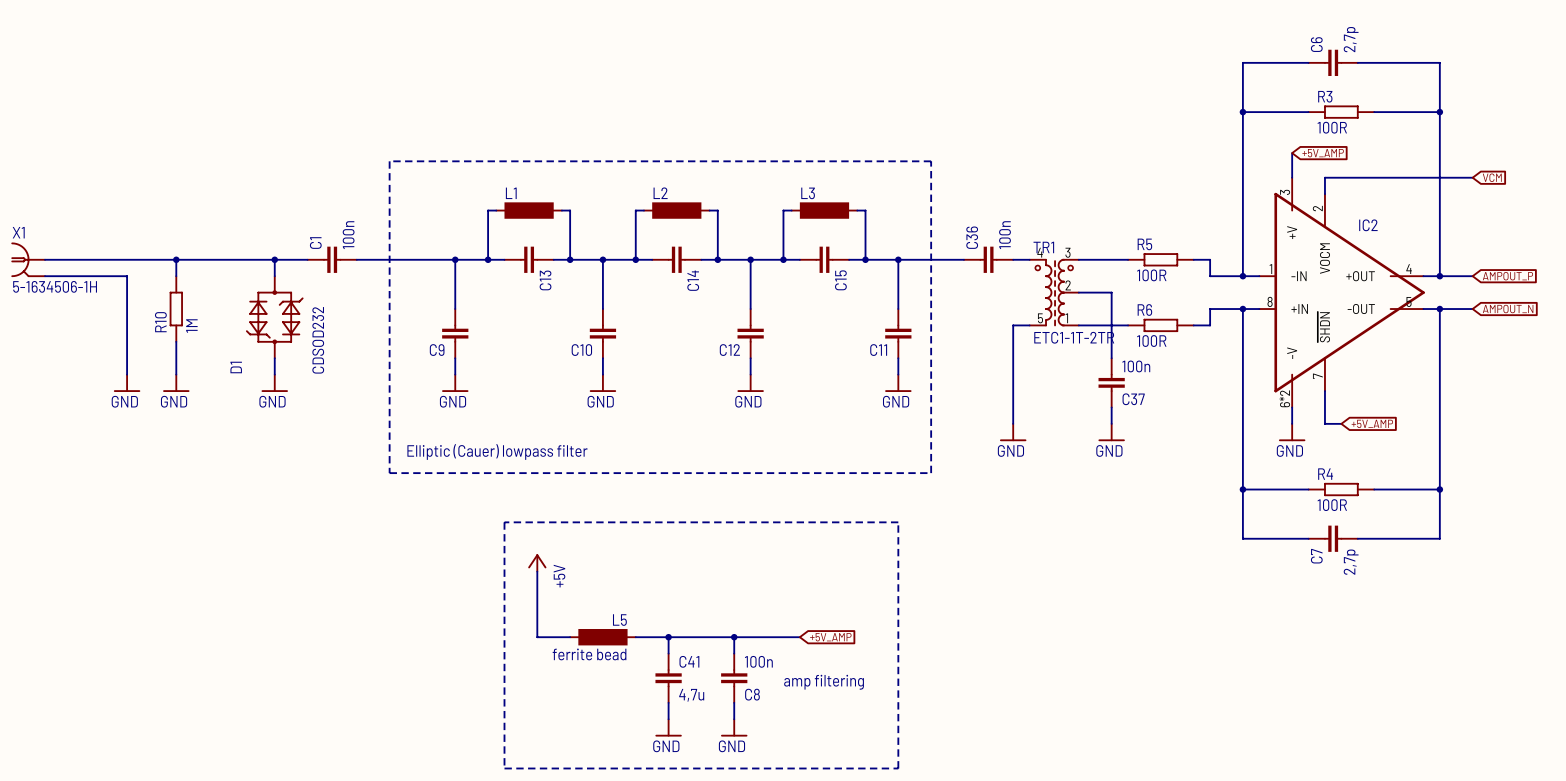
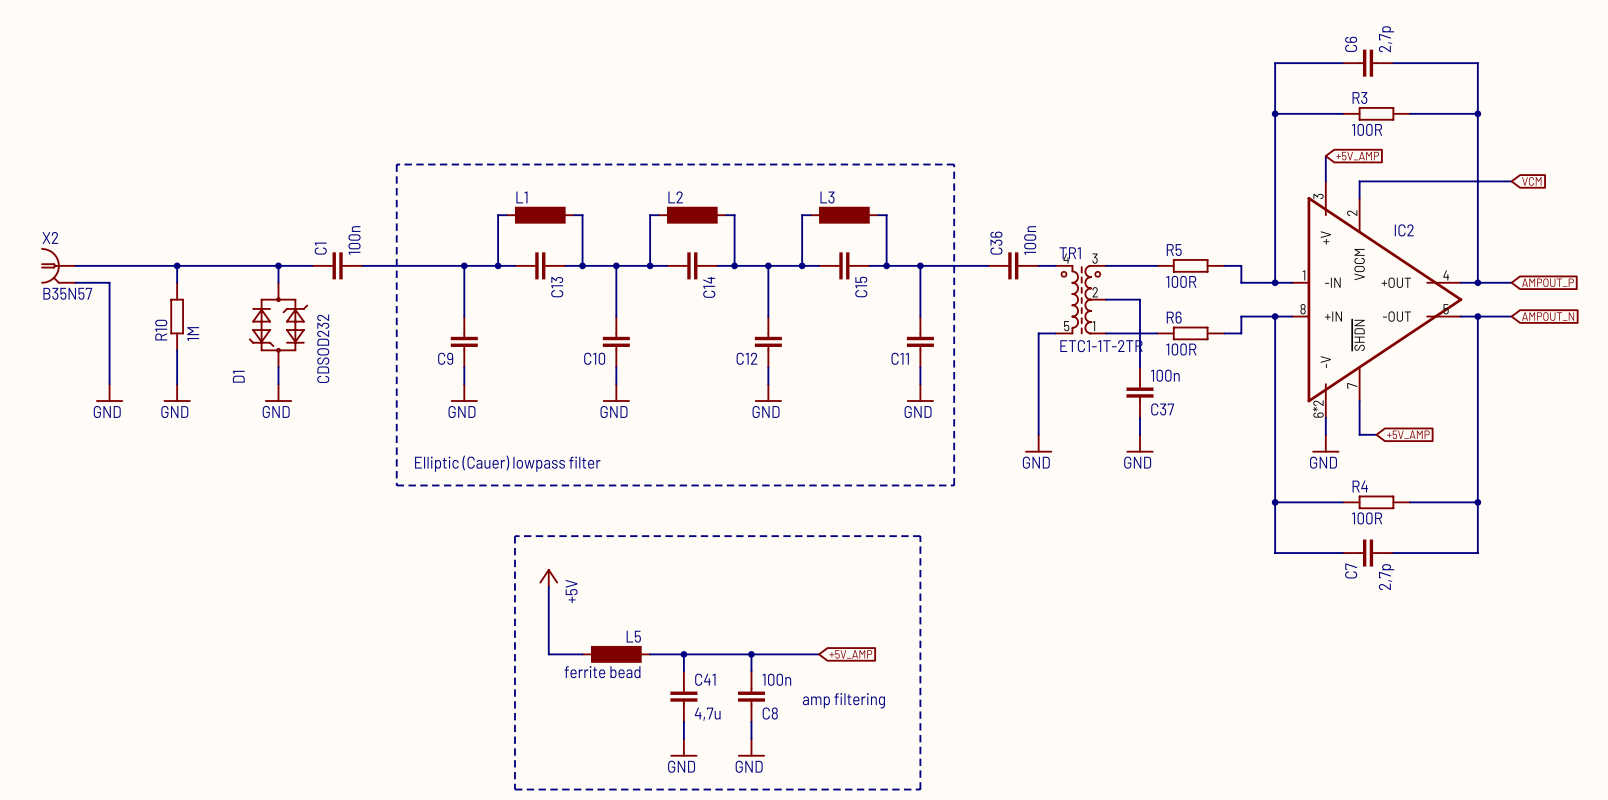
X1: 5-1634506-1H (28, 259) -> none
X2: none -> B35N57 (58, 265)
wire: (110, 276) (127, 276) (127, 374) -> (109, 282) (109, 384)
power symbol position: GND (127, 383) -> GND (109, 392)

